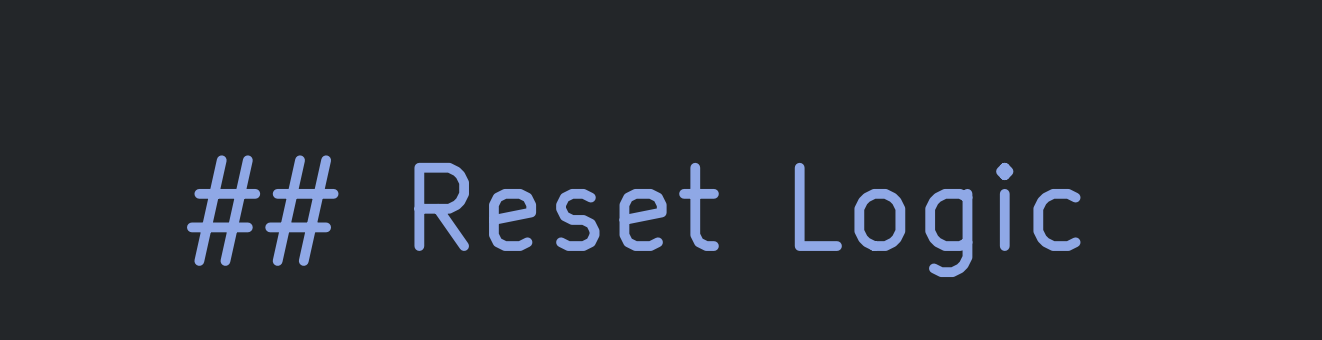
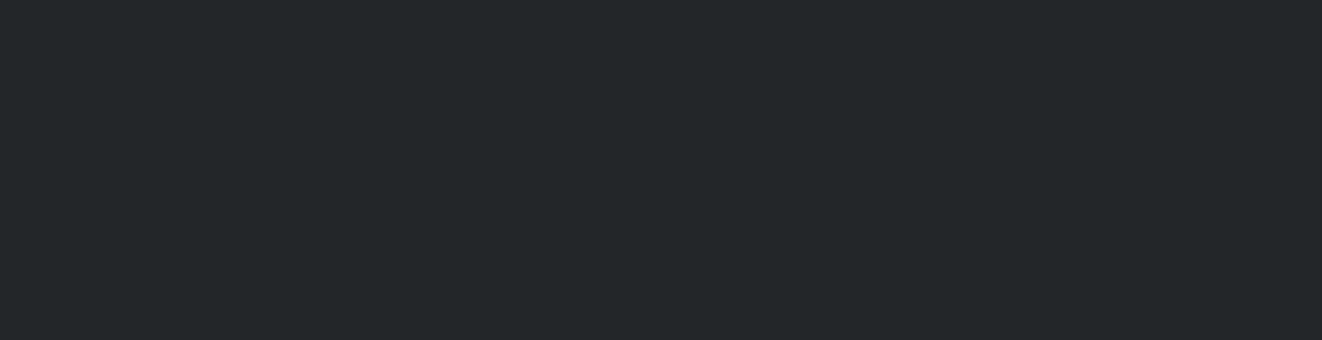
text: ## Reset Logic (633, 216) -> none

